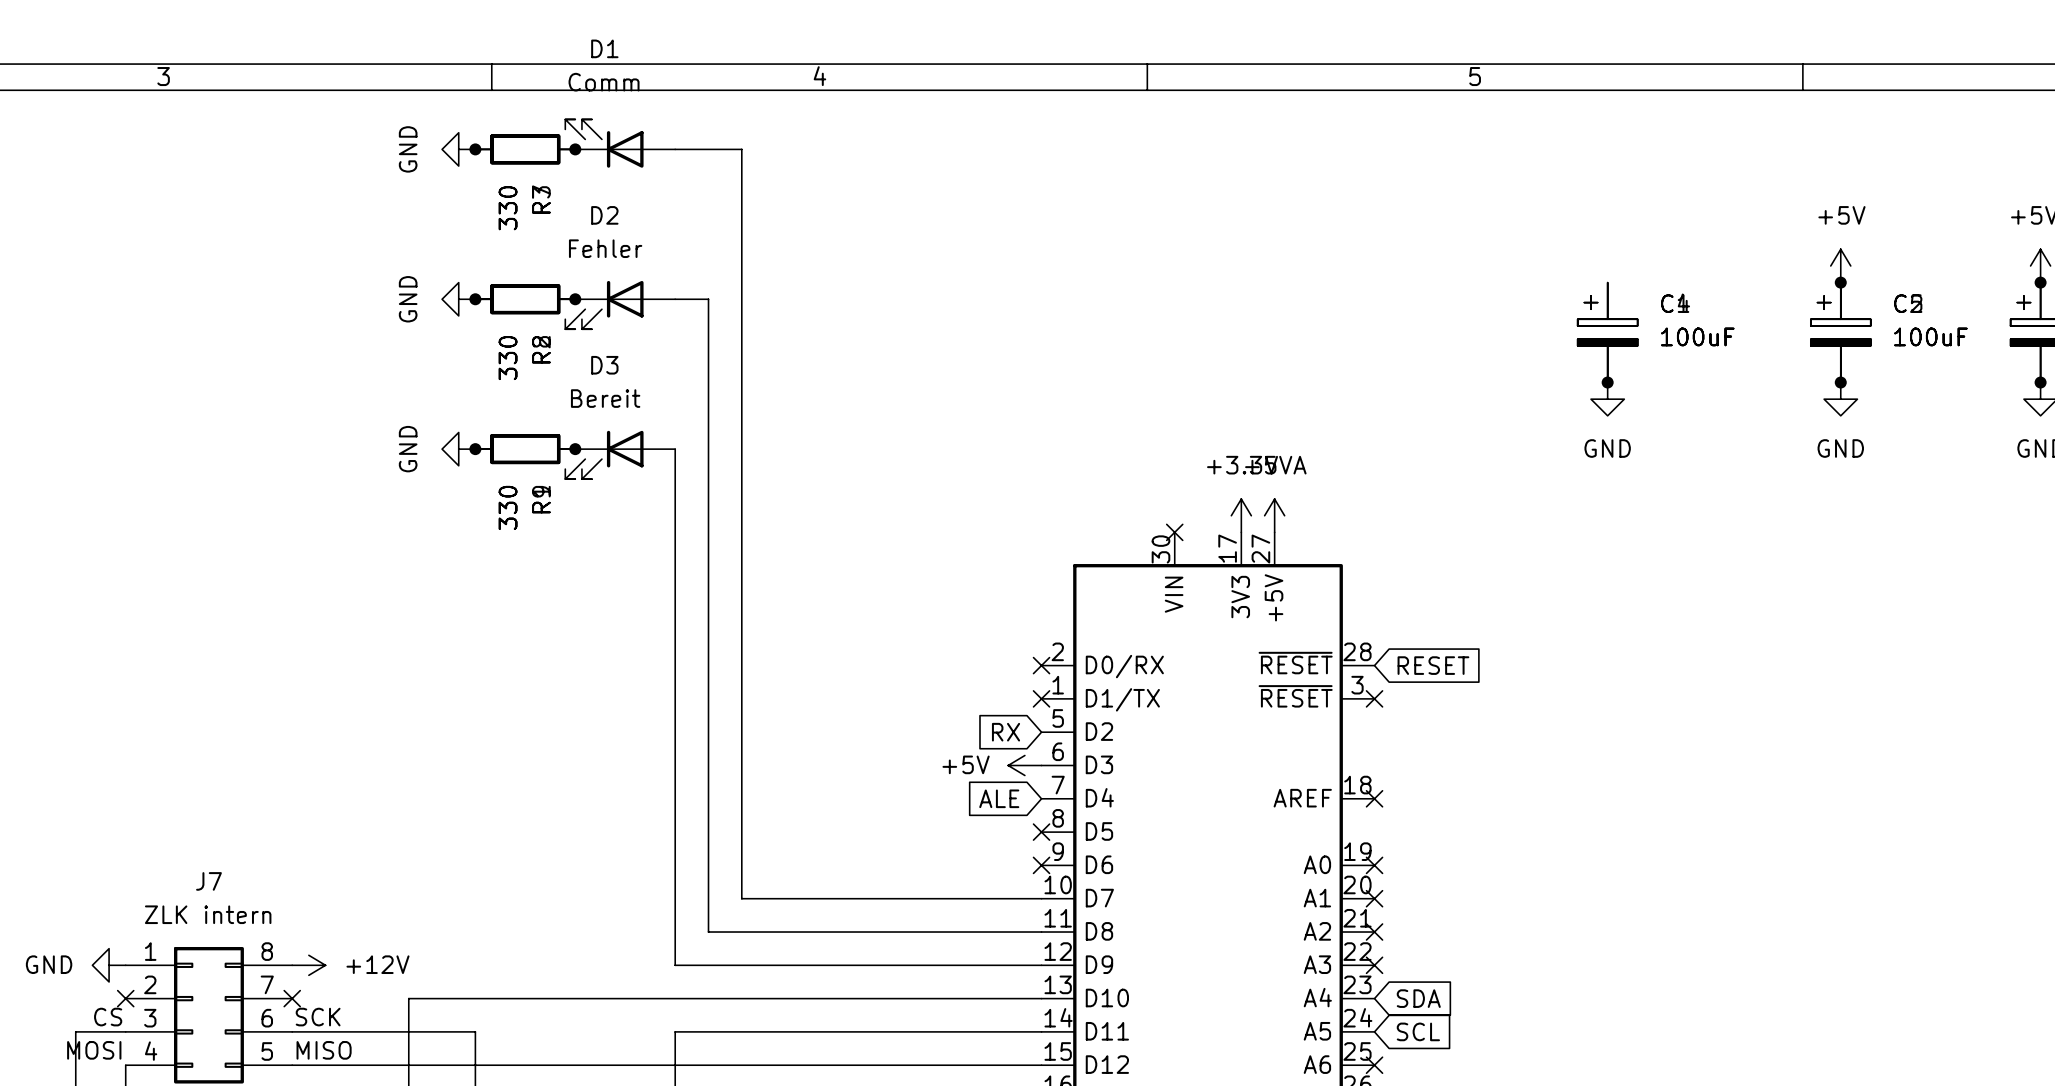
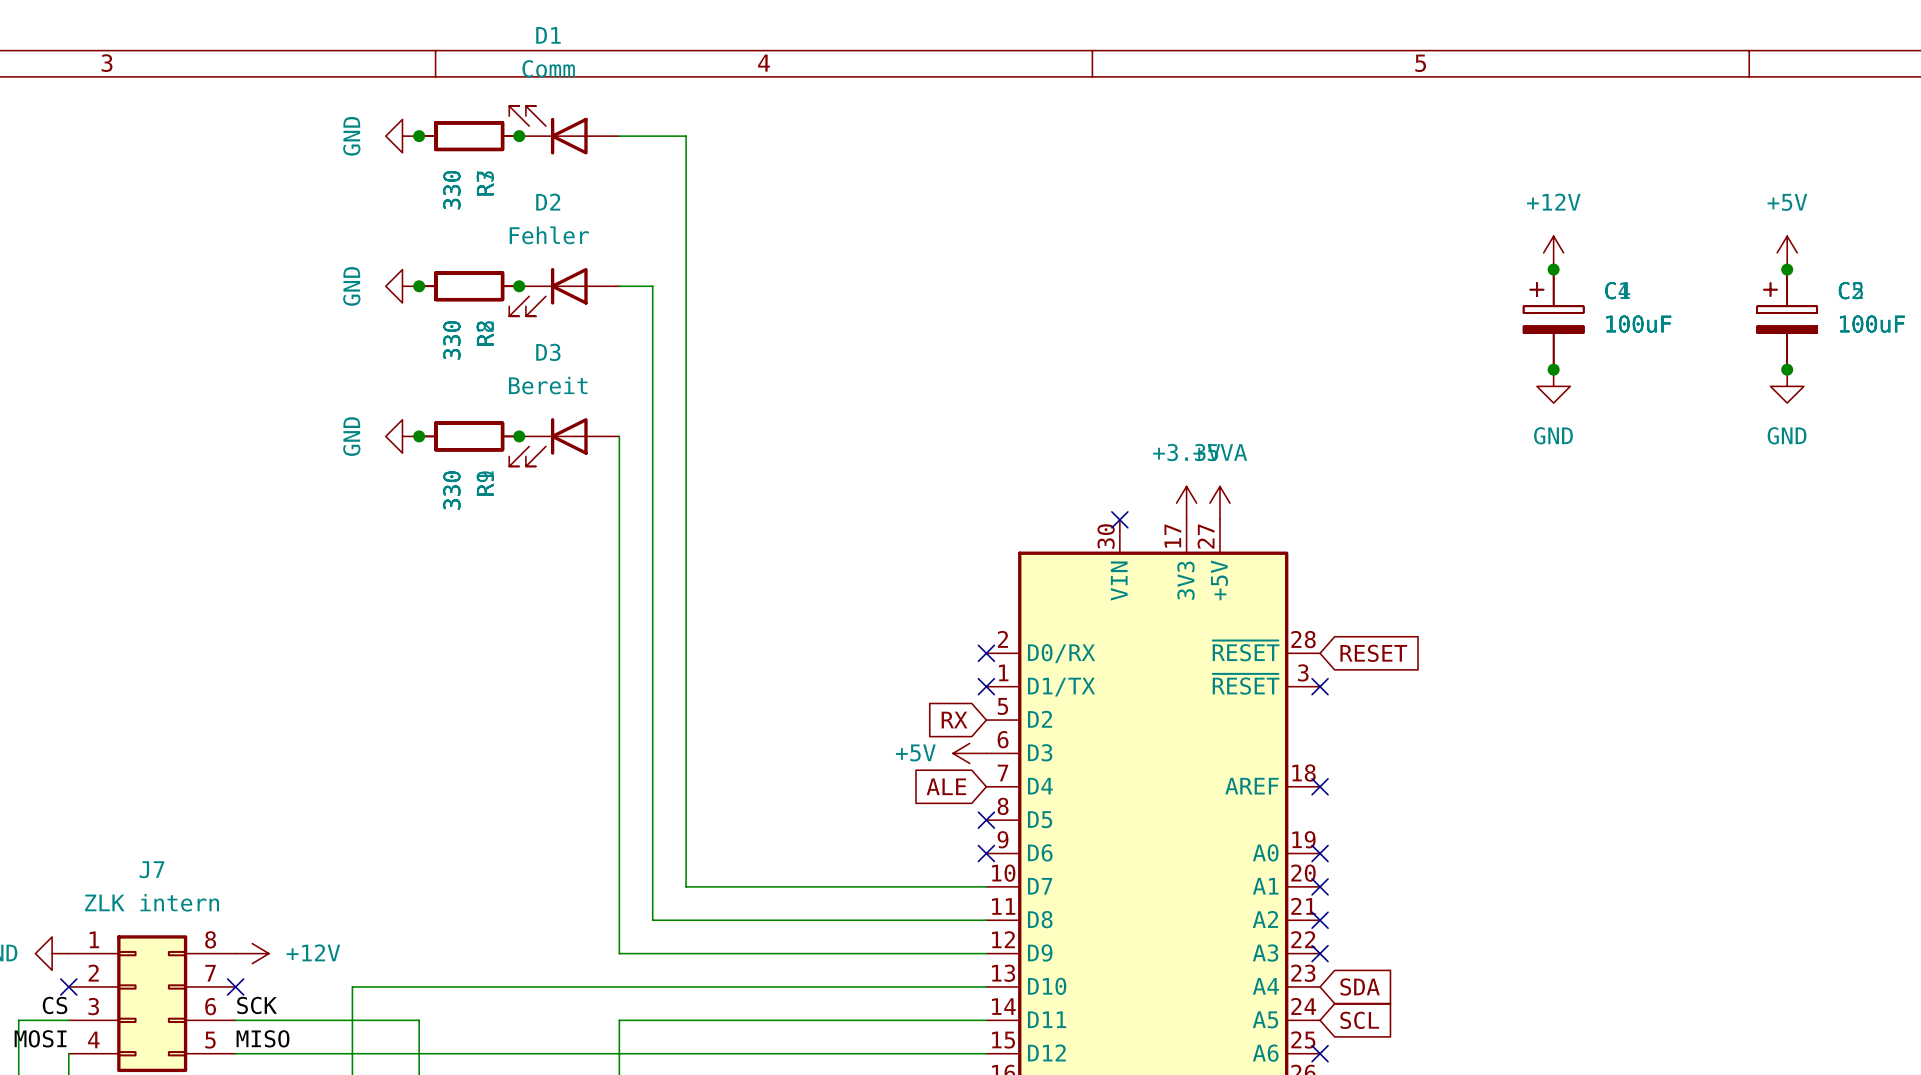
power symbol: none -> +12V (1553, 252)
junction: none -> (1553, 269)

